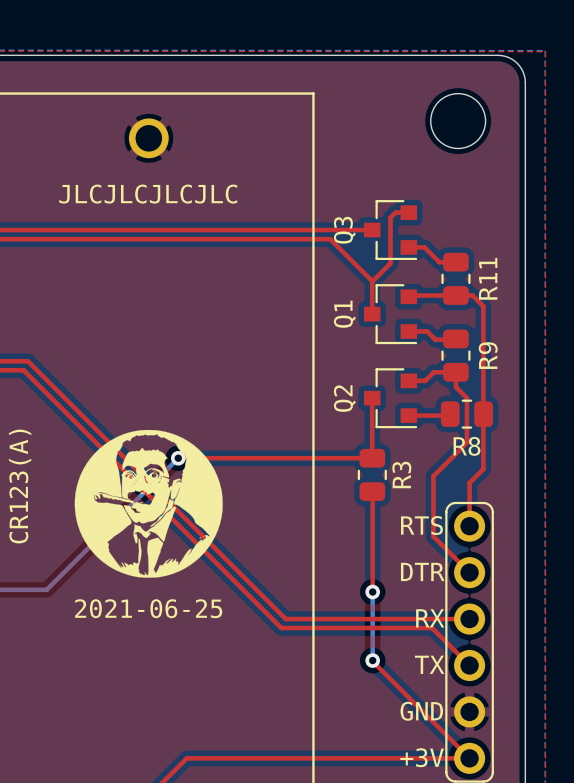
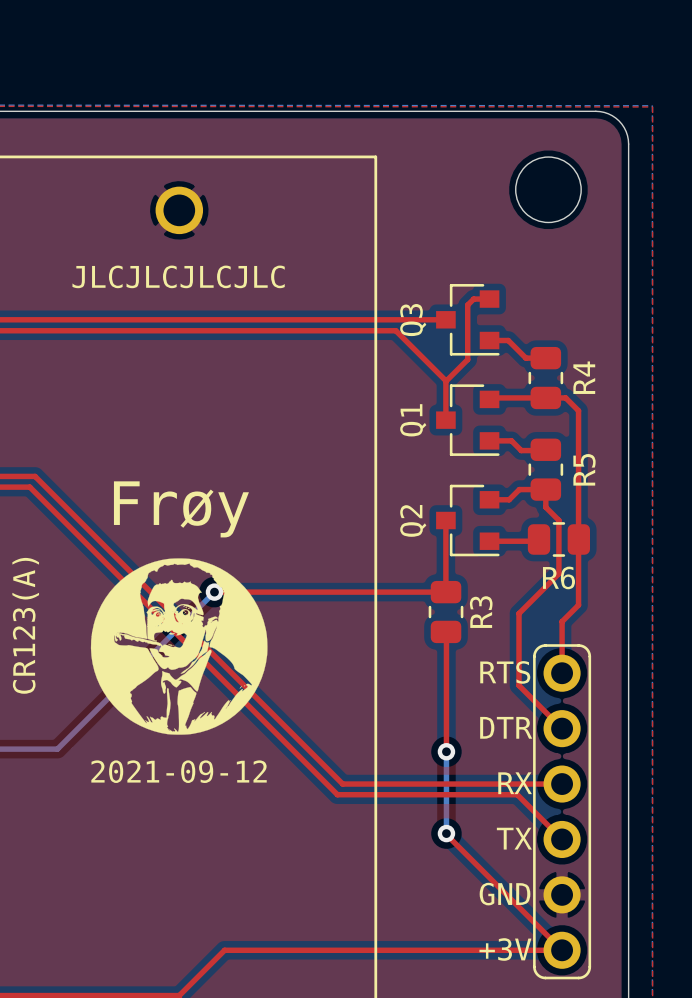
R11 name: R11 (488, 278) -> R4 (584, 377)
R9 name: R9 (488, 355) -> R5 (584, 469)
text: none -> Frøy (181, 509)
R8 name: R8 (467, 446) -> R6 (558, 577)
text: 2021-06-25 (148, 608) -> 2021-09-12 (179, 771)

